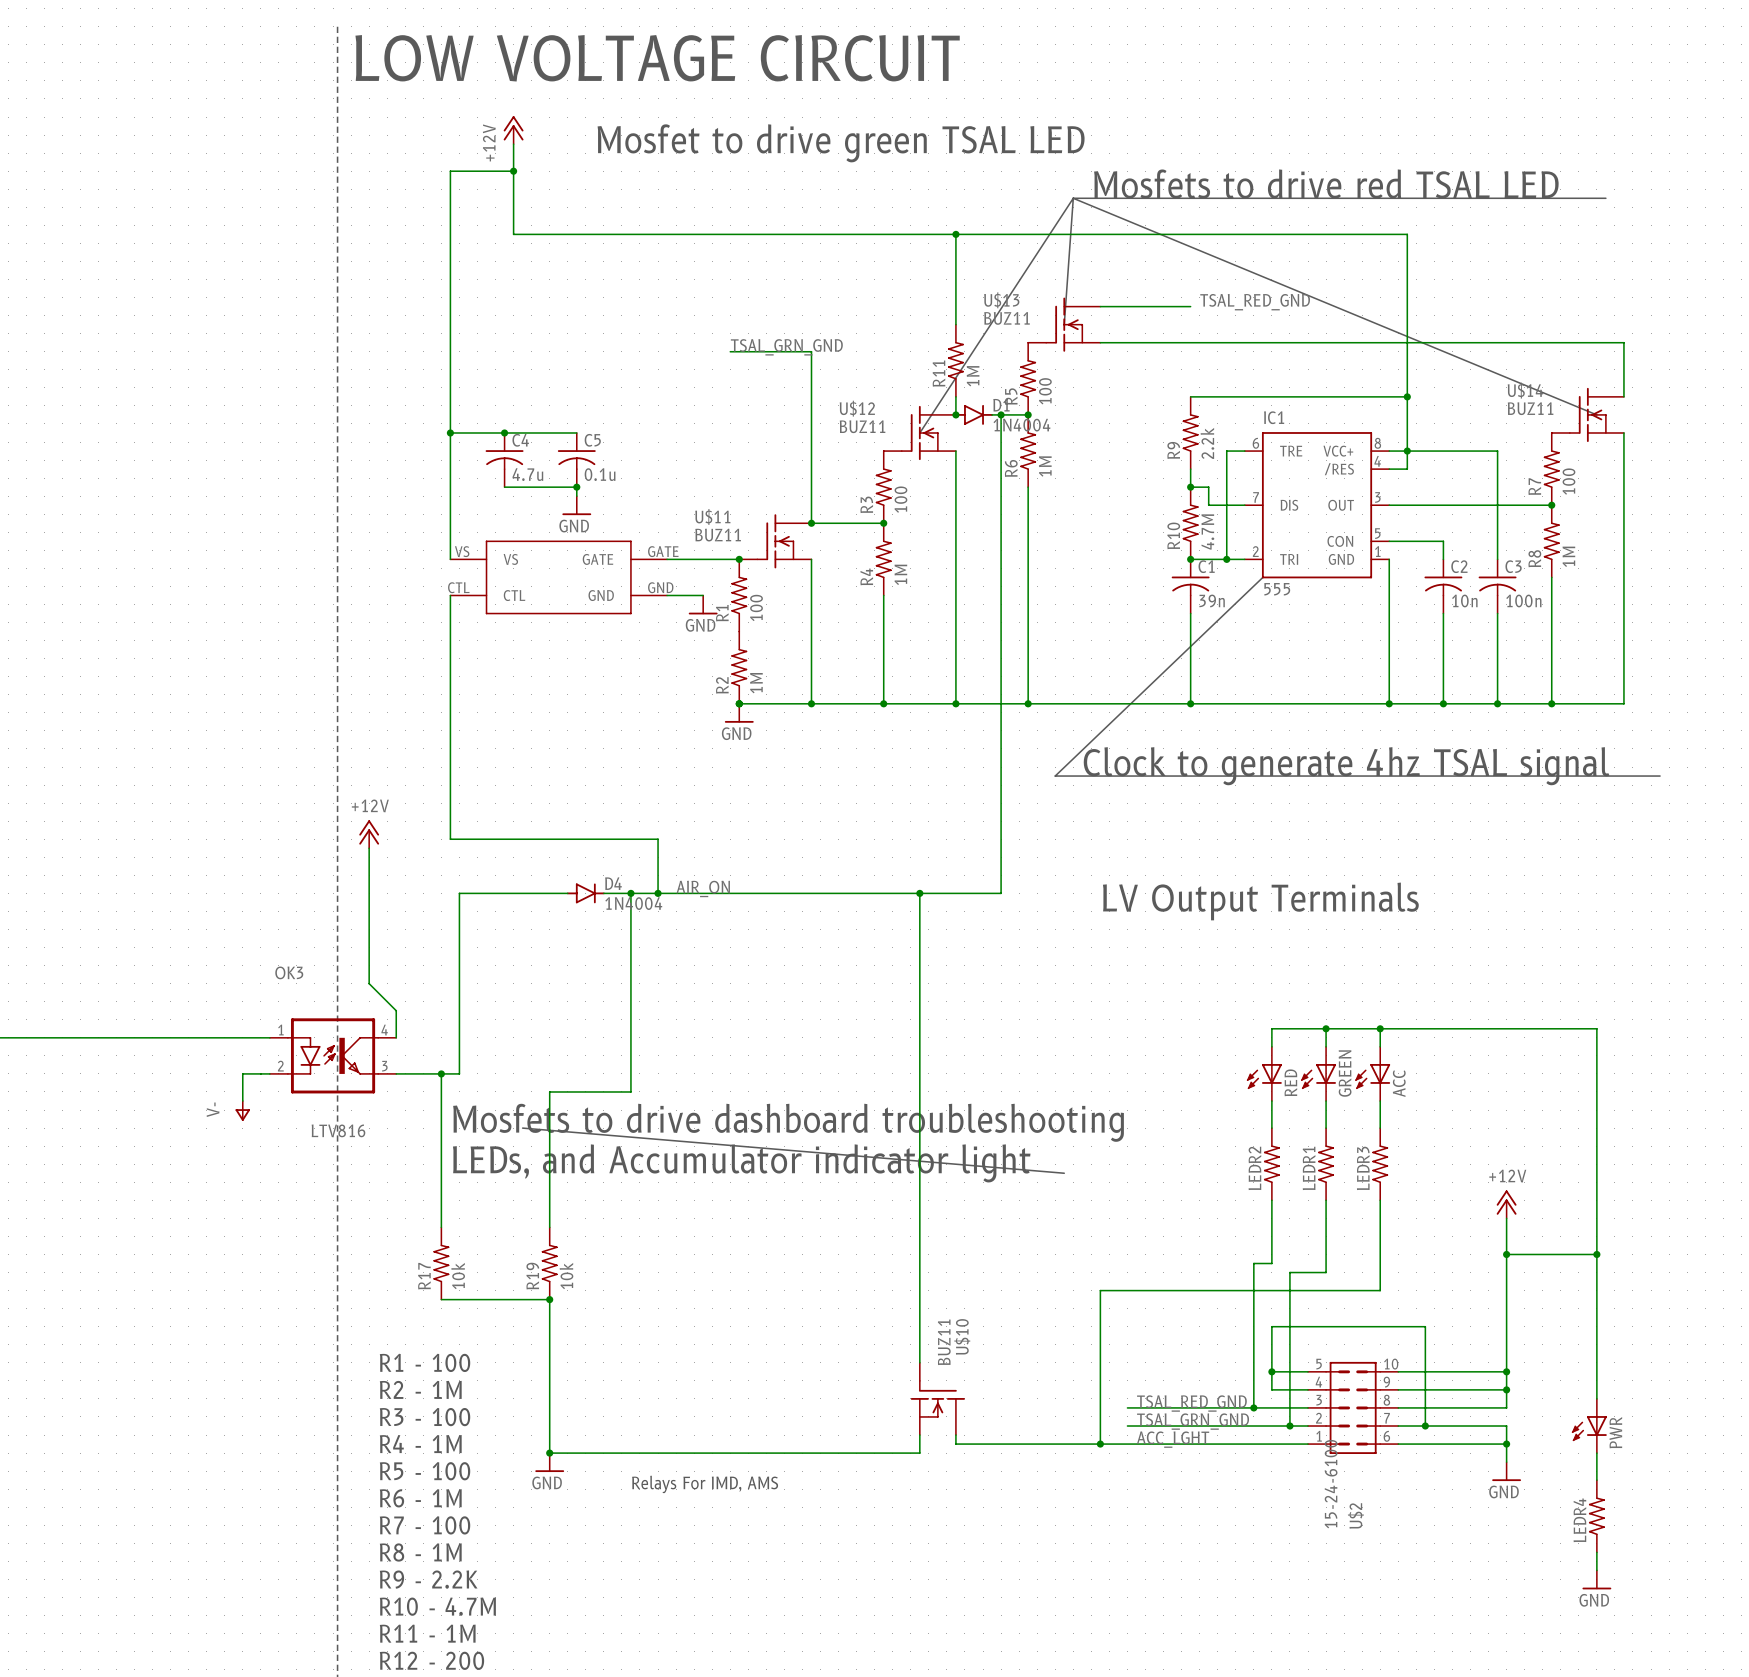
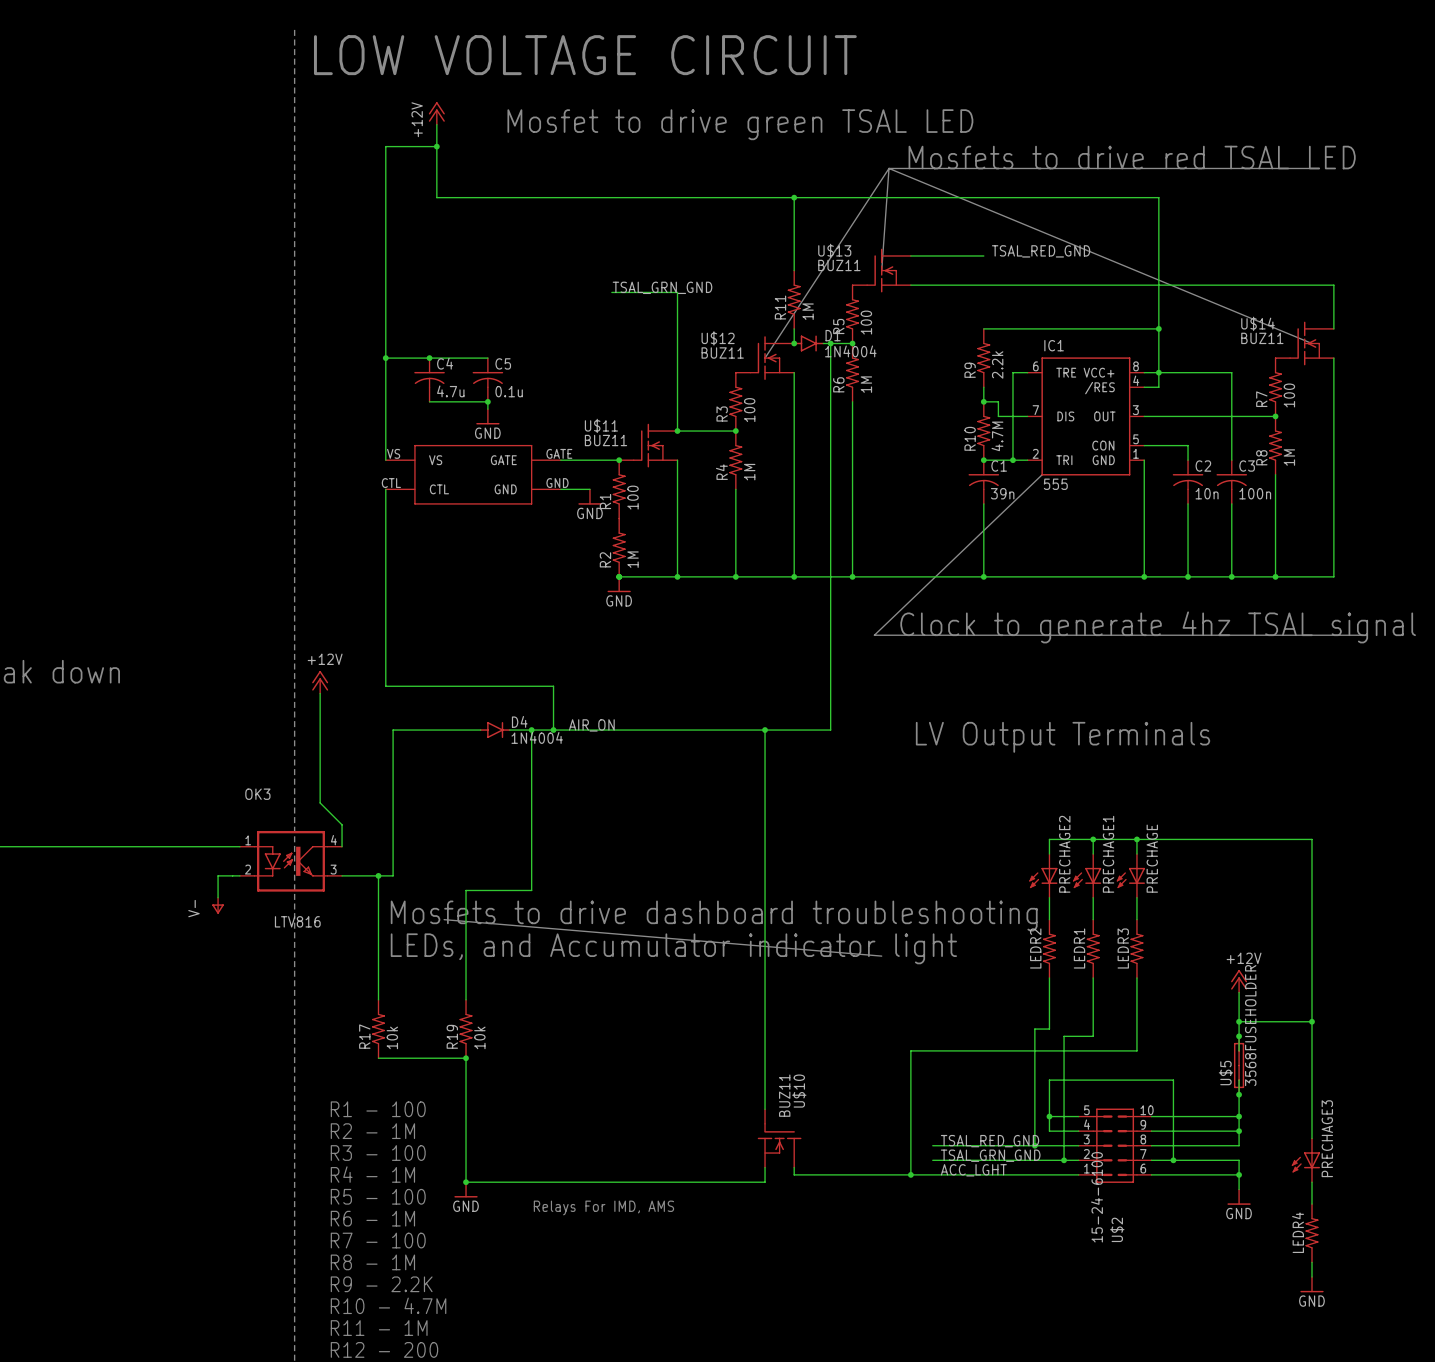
GREEN name: GREEN (1345, 1073) -> PRECHAGE1 (1108, 854)
RED name: RED (1290, 1082) -> PRECHAGE2 (1064, 854)
ACC name: ACC (1399, 1083) -> PRECHAGE (1152, 858)
junction: none -> (1239, 1036)
U$5: none -> 3568FUSEHOLDER (1239, 1065)
junction: none -> (1239, 1094)
PWR name: PWR (1615, 1432) -> PRECHAGE3 (1327, 1138)

